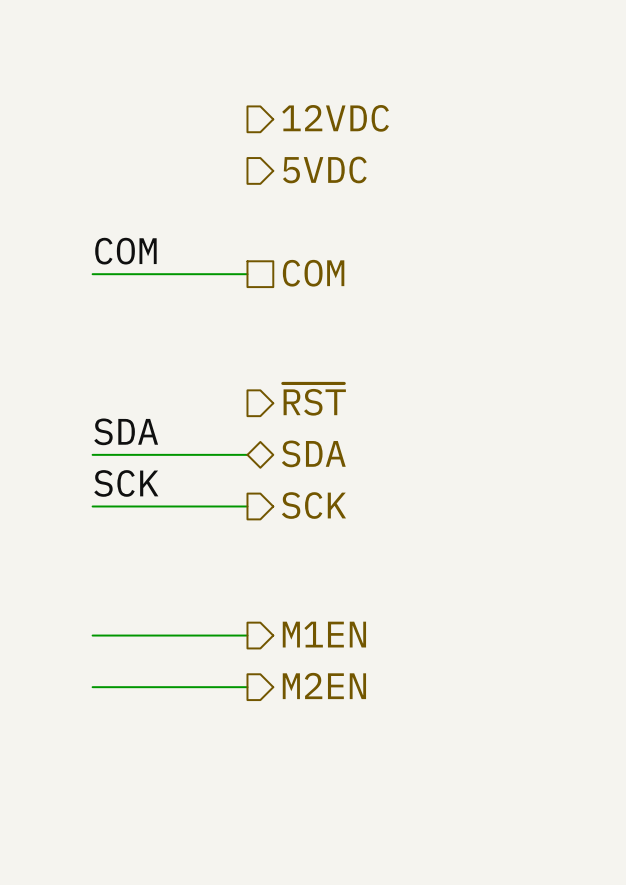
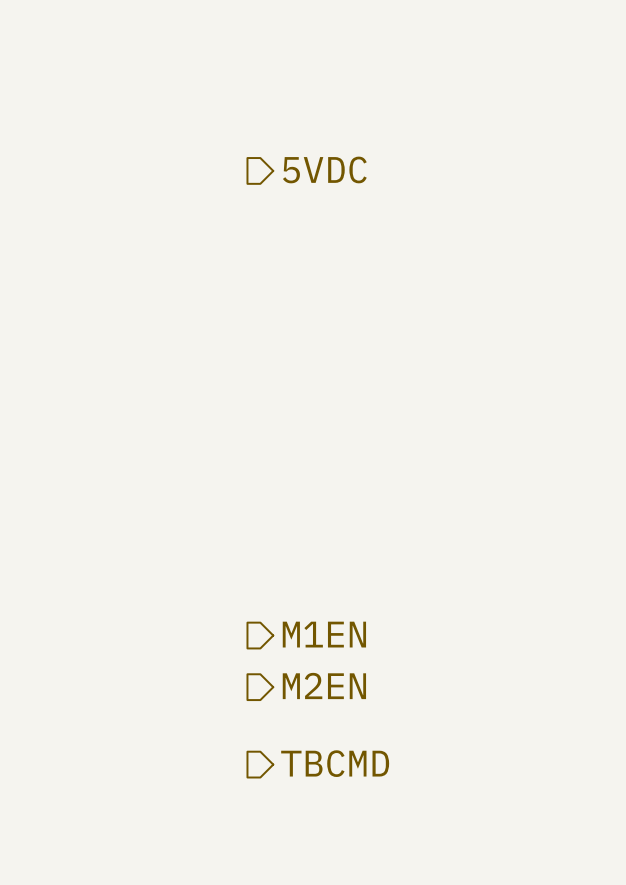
hierarchical label: 12VDC (335, 118) -> none
label: COM (125, 251) -> none
hierarchical label: COM (313, 273) -> none
wire: (92, 274) (247, 274) -> none
hierarchical label: ~{RST} (314, 399) -> none
label: SDA (126, 431) -> none
hierarchical label: SDA (313, 453) -> none
wire: (92, 454) (247, 454) -> none
label: SCK (126, 483) -> none
hierarchical label: SCK (313, 505) -> none
wire: (92, 506) (247, 506) -> none
wire: (92, 635) (247, 635) -> none
wire: (92, 687) (247, 687) -> none
hierarchical label: none -> TBCMD (335, 763)

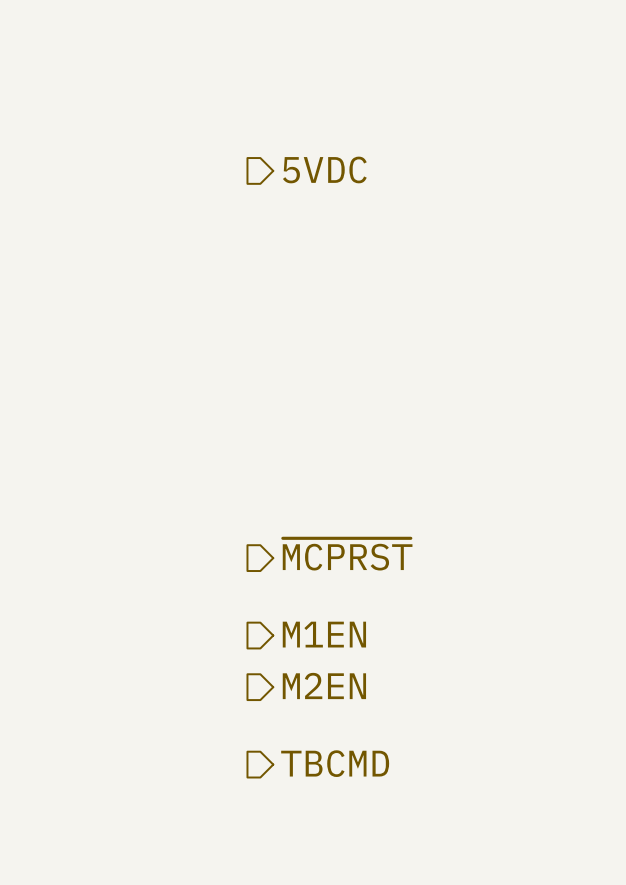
hierarchical label: none -> ~{MCPRST} (347, 554)

